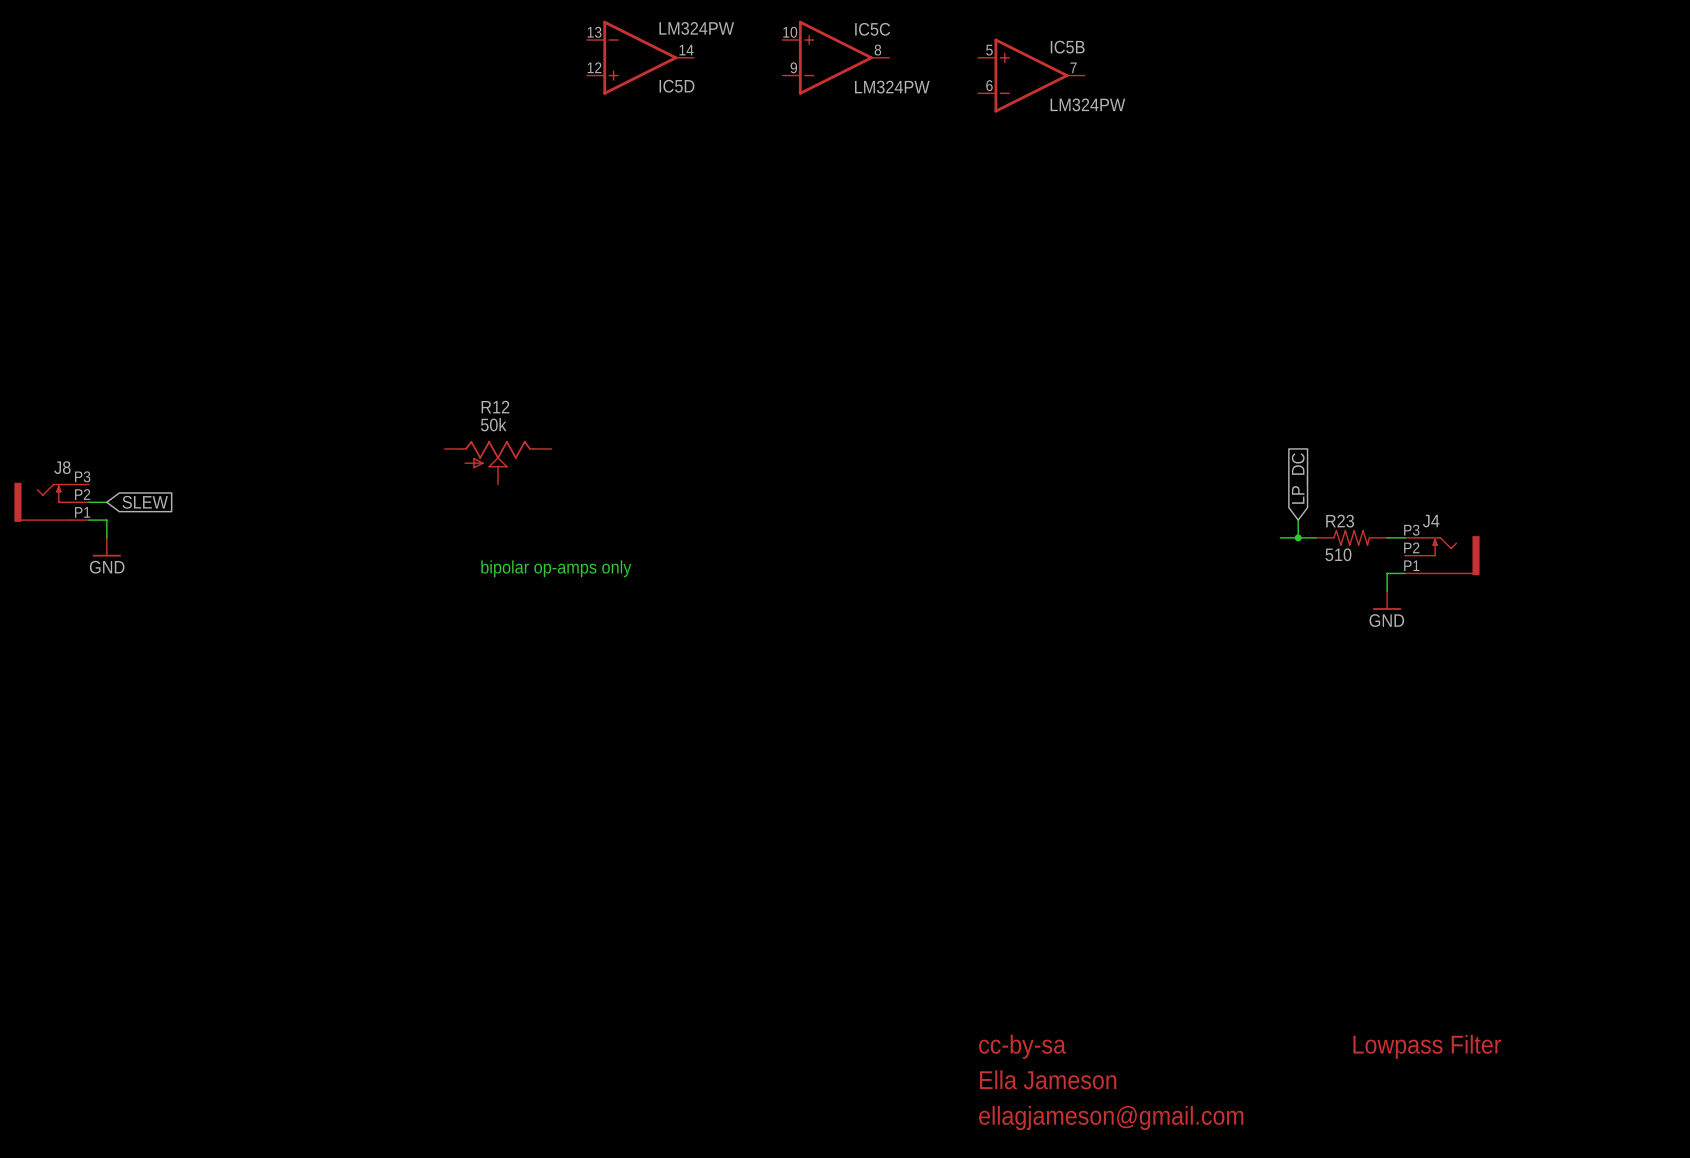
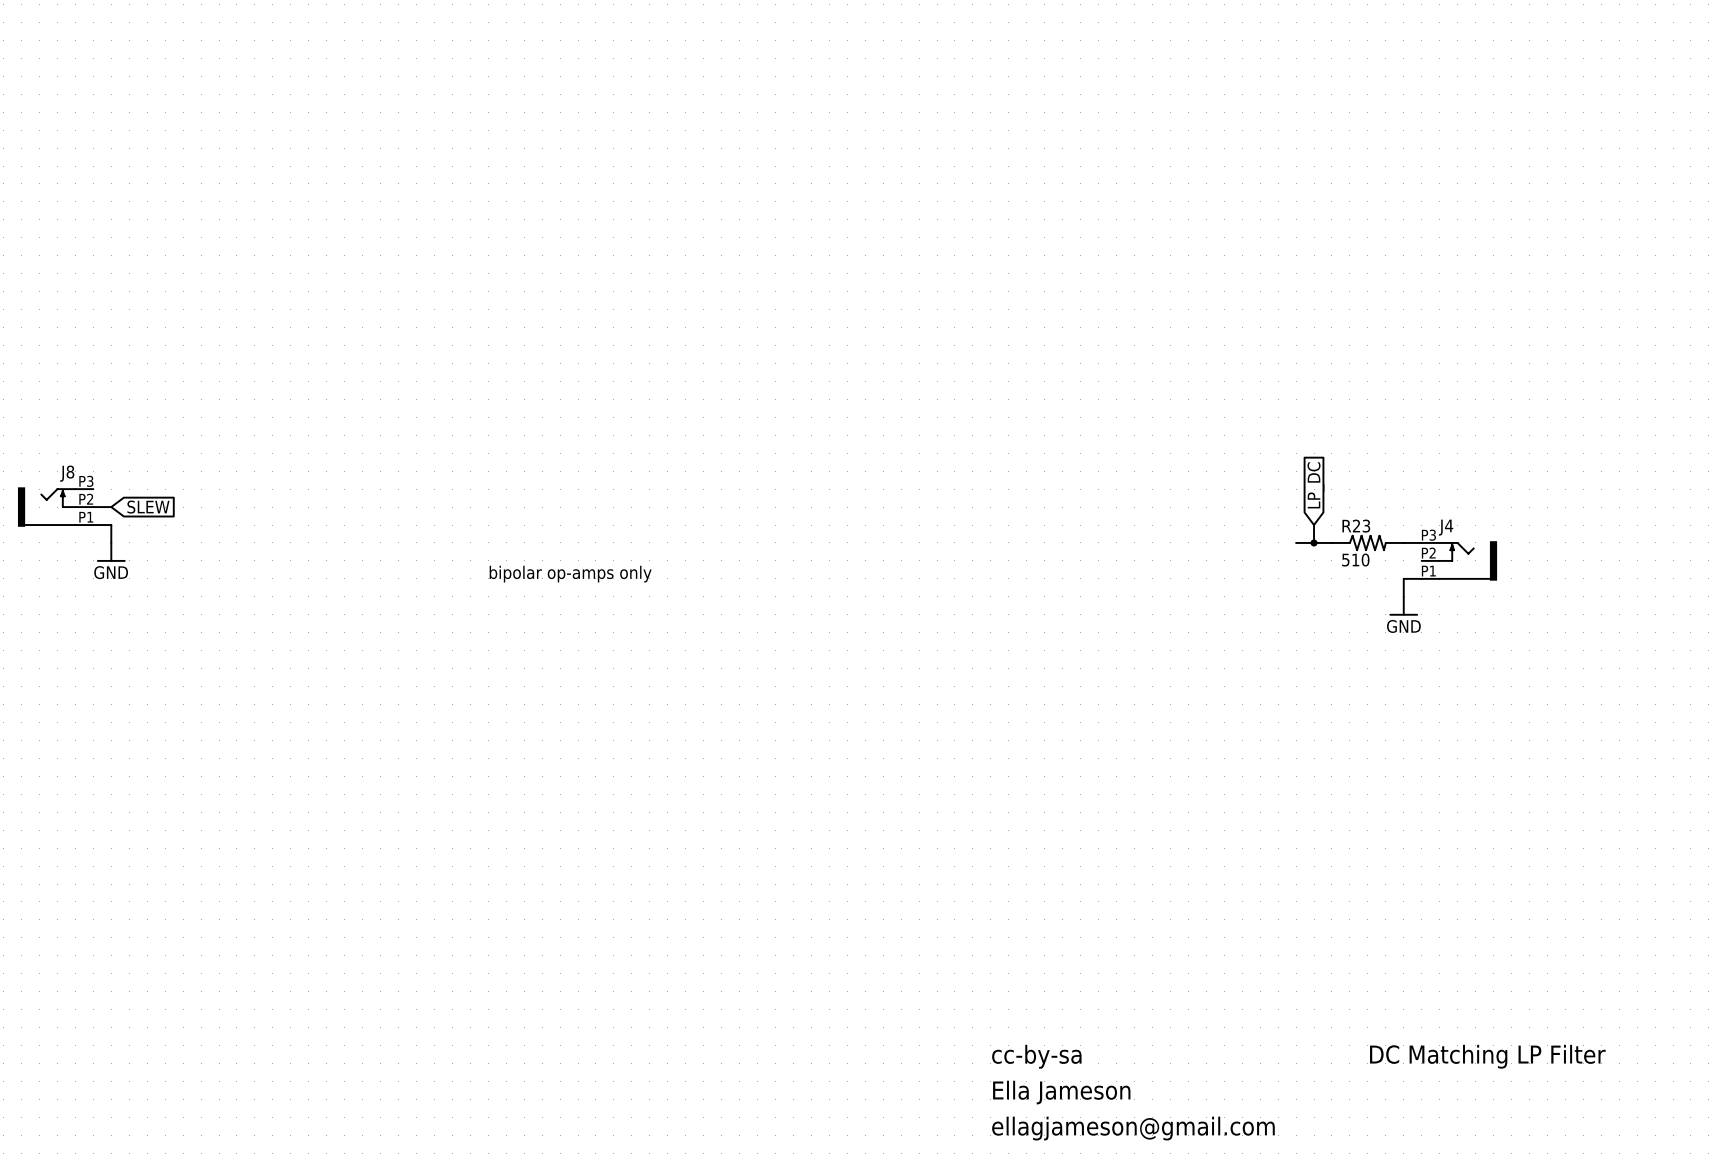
IC5D: LM324PW (640, 57) -> none
IC5C: LM324PW (835, 57) -> none
IC5B: LM324PW (1031, 75) -> none
R12: 50k (498, 462) -> none
text: Lowpass Filter (1427, 1046) -> DC Matching LP Filter (1487, 1056)

